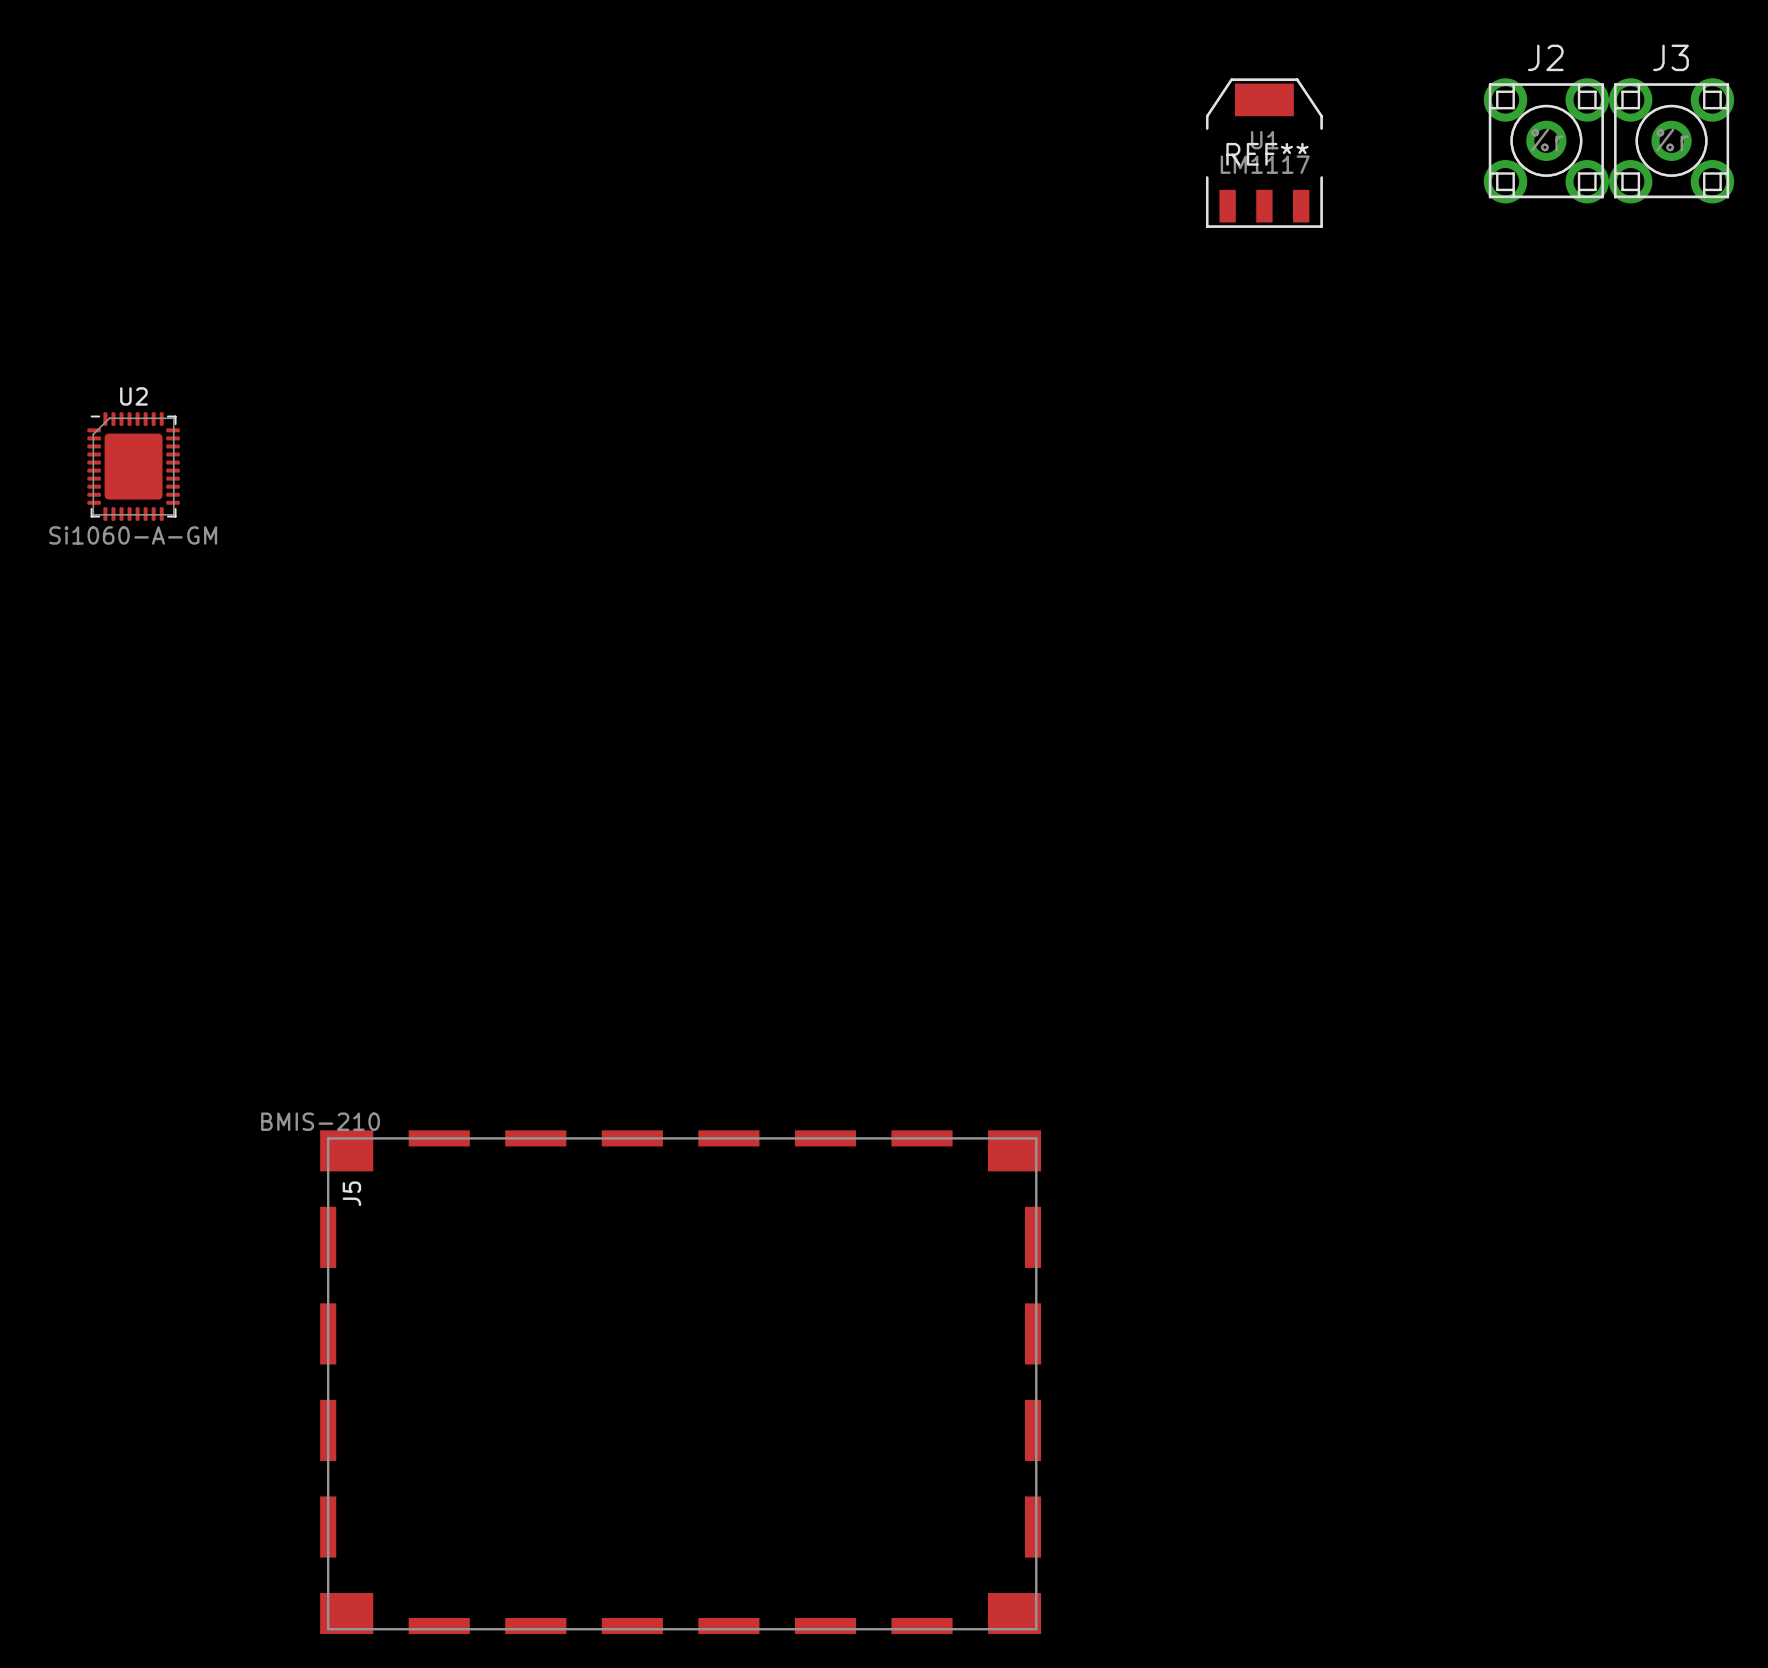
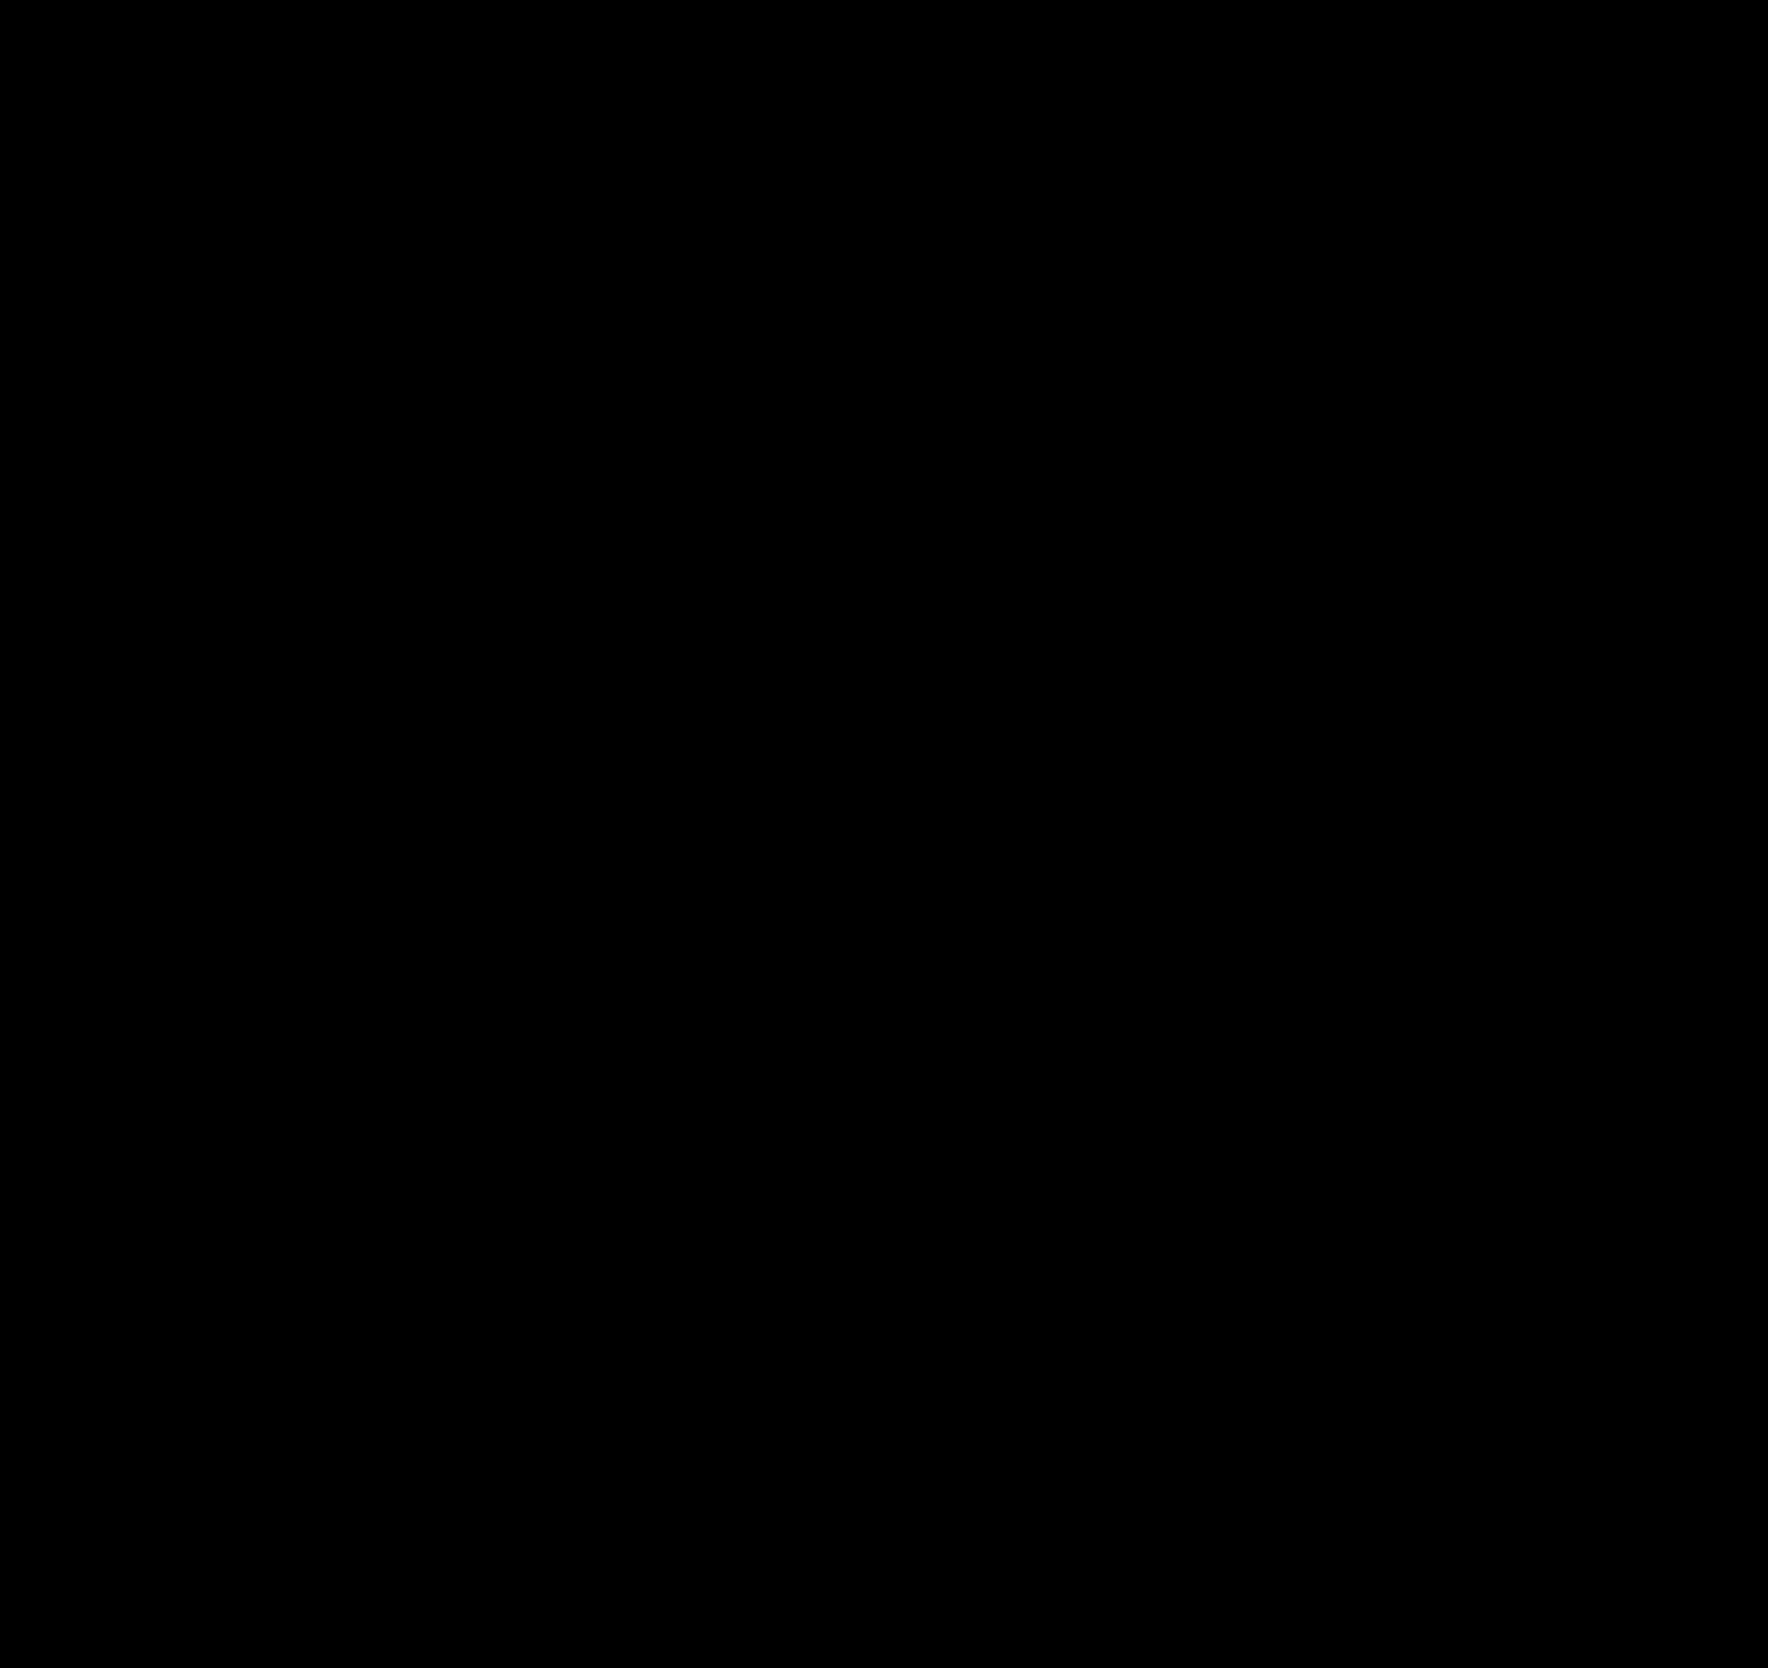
J2: (1546, 140) -> none
J3: (1671, 140) -> none
U1: LM1117 (1264, 153) -> none
U2: Si1060-A-GM (133, 466) -> none
J5: BMIS-210 (680, 1382) -> none

